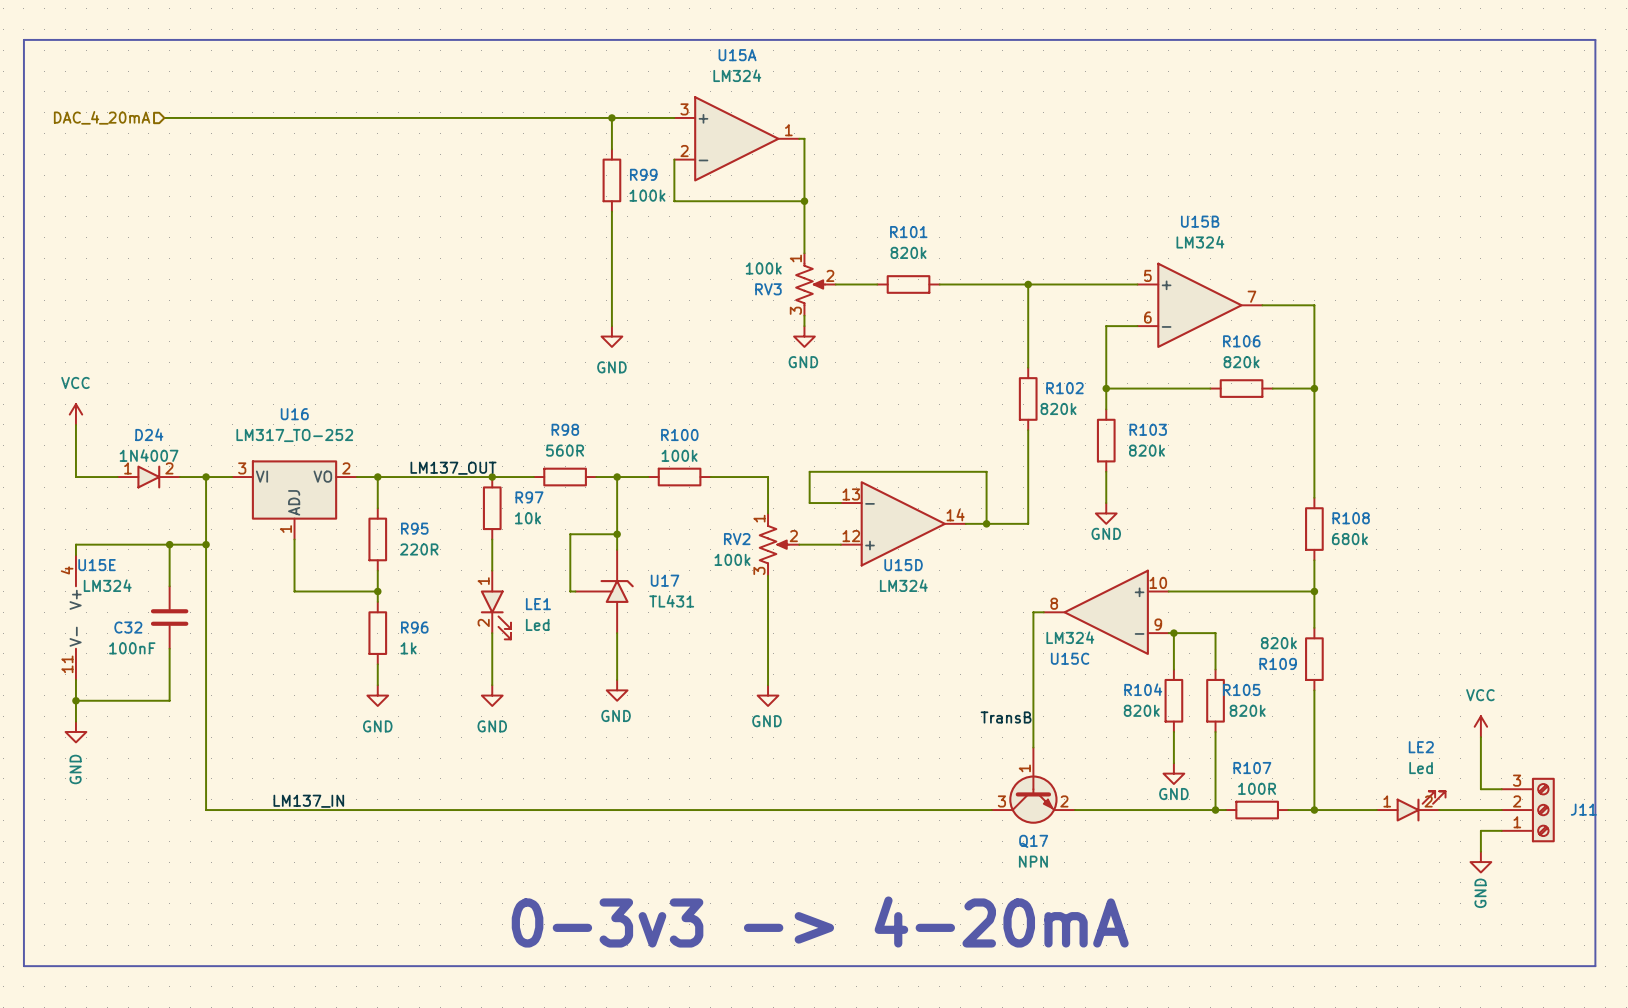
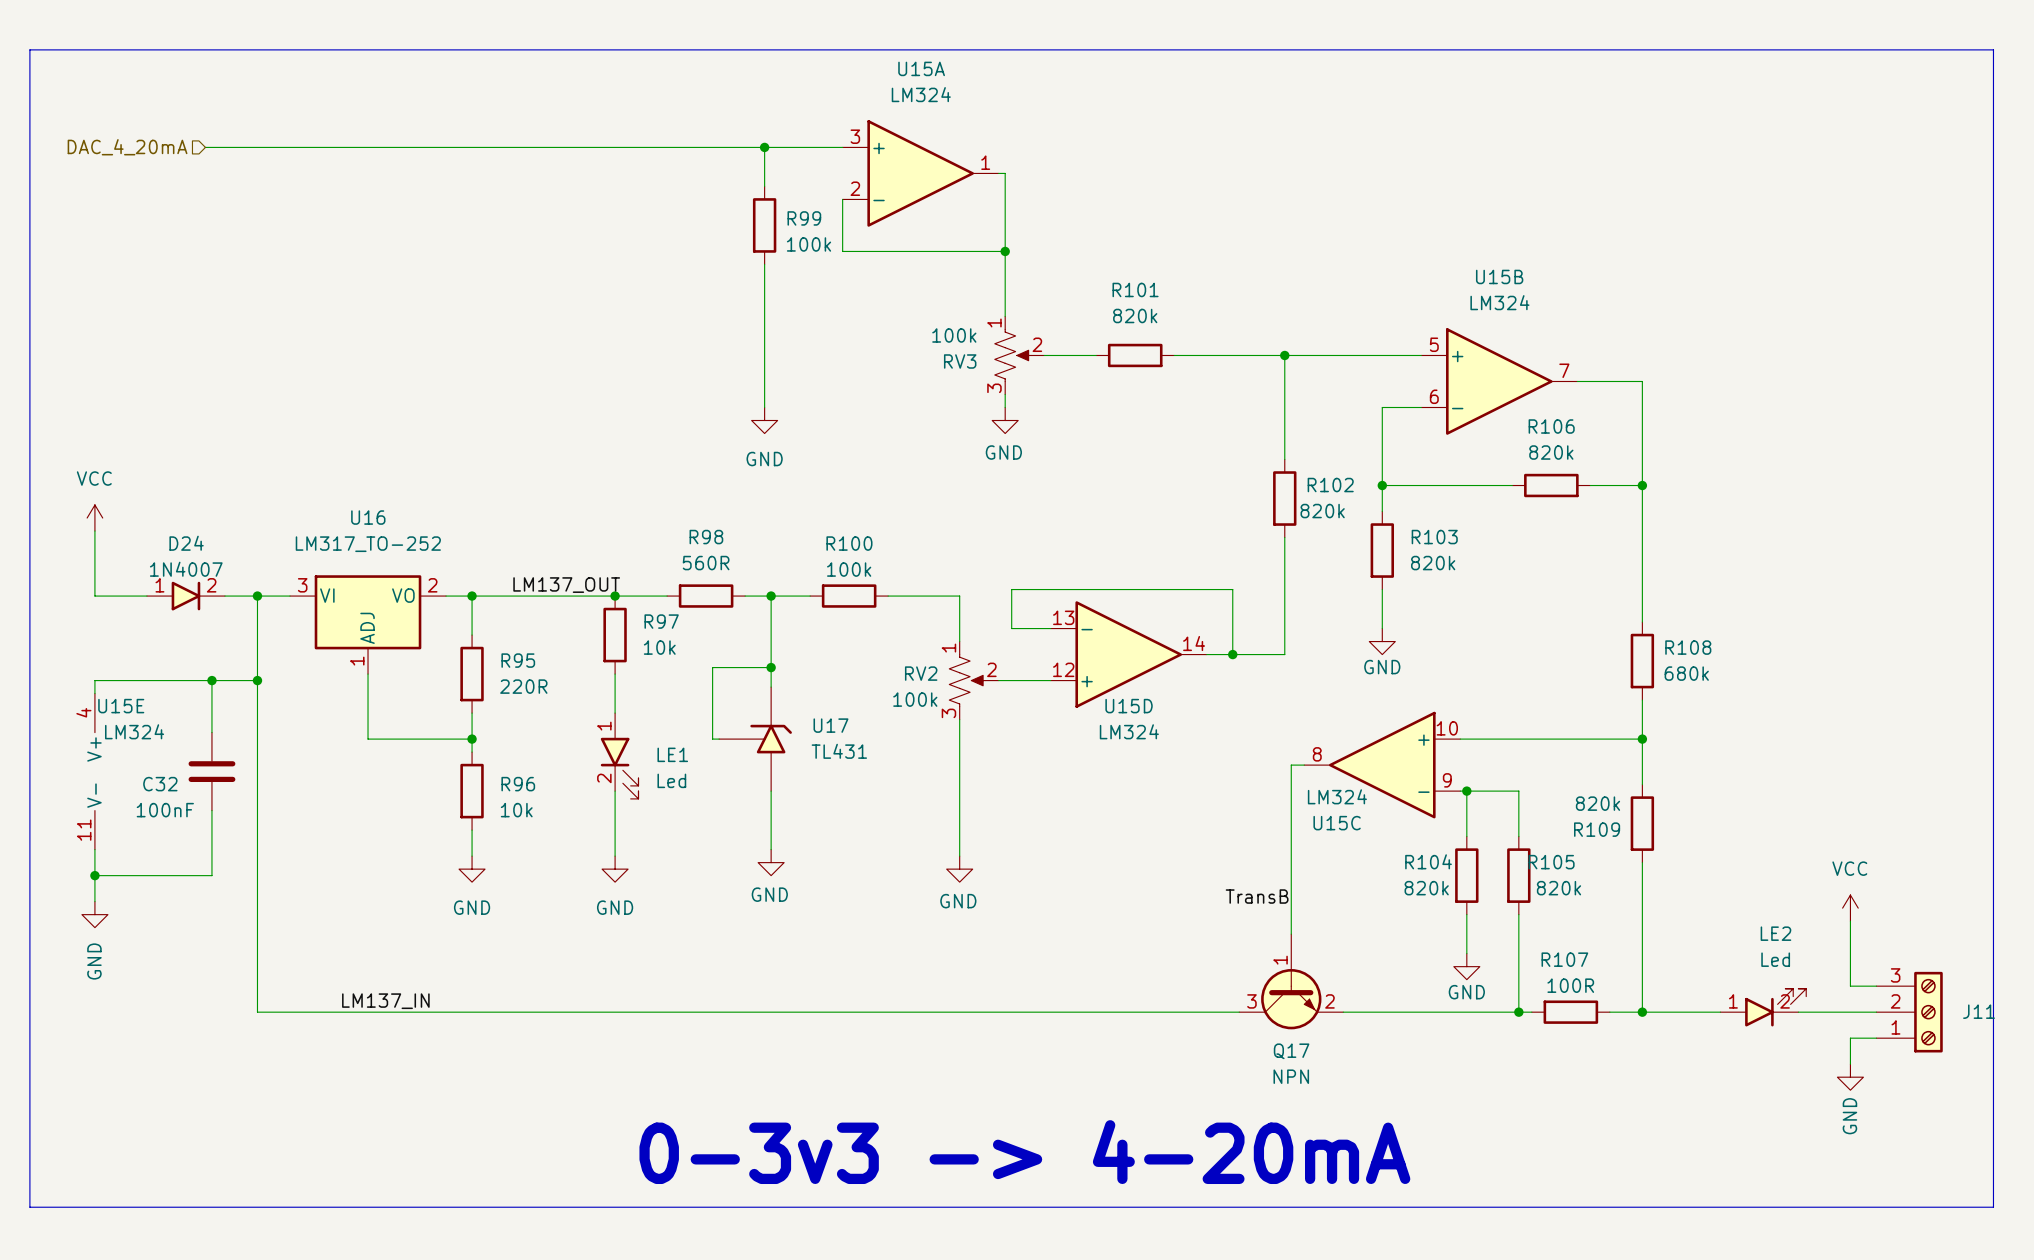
R96 value: 1k (408, 648) -> 10k (516, 810)

